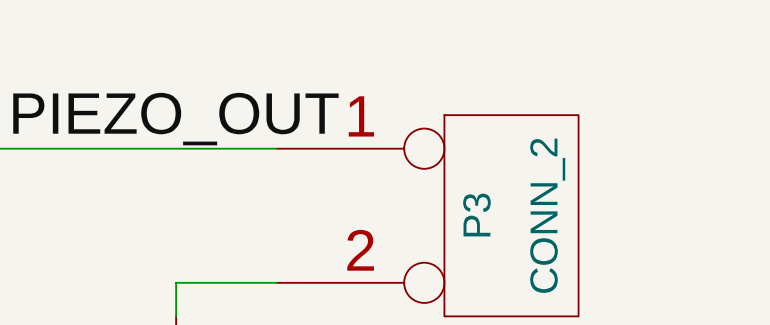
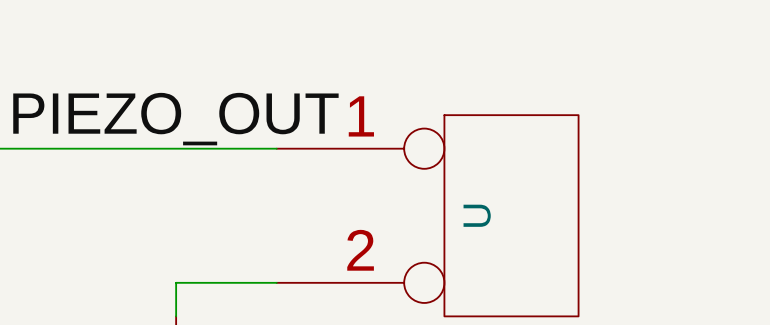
P3 name: P3 (476, 215) -> U (477, 215)
P3 value: CONN_2 (547, 215) -> none

